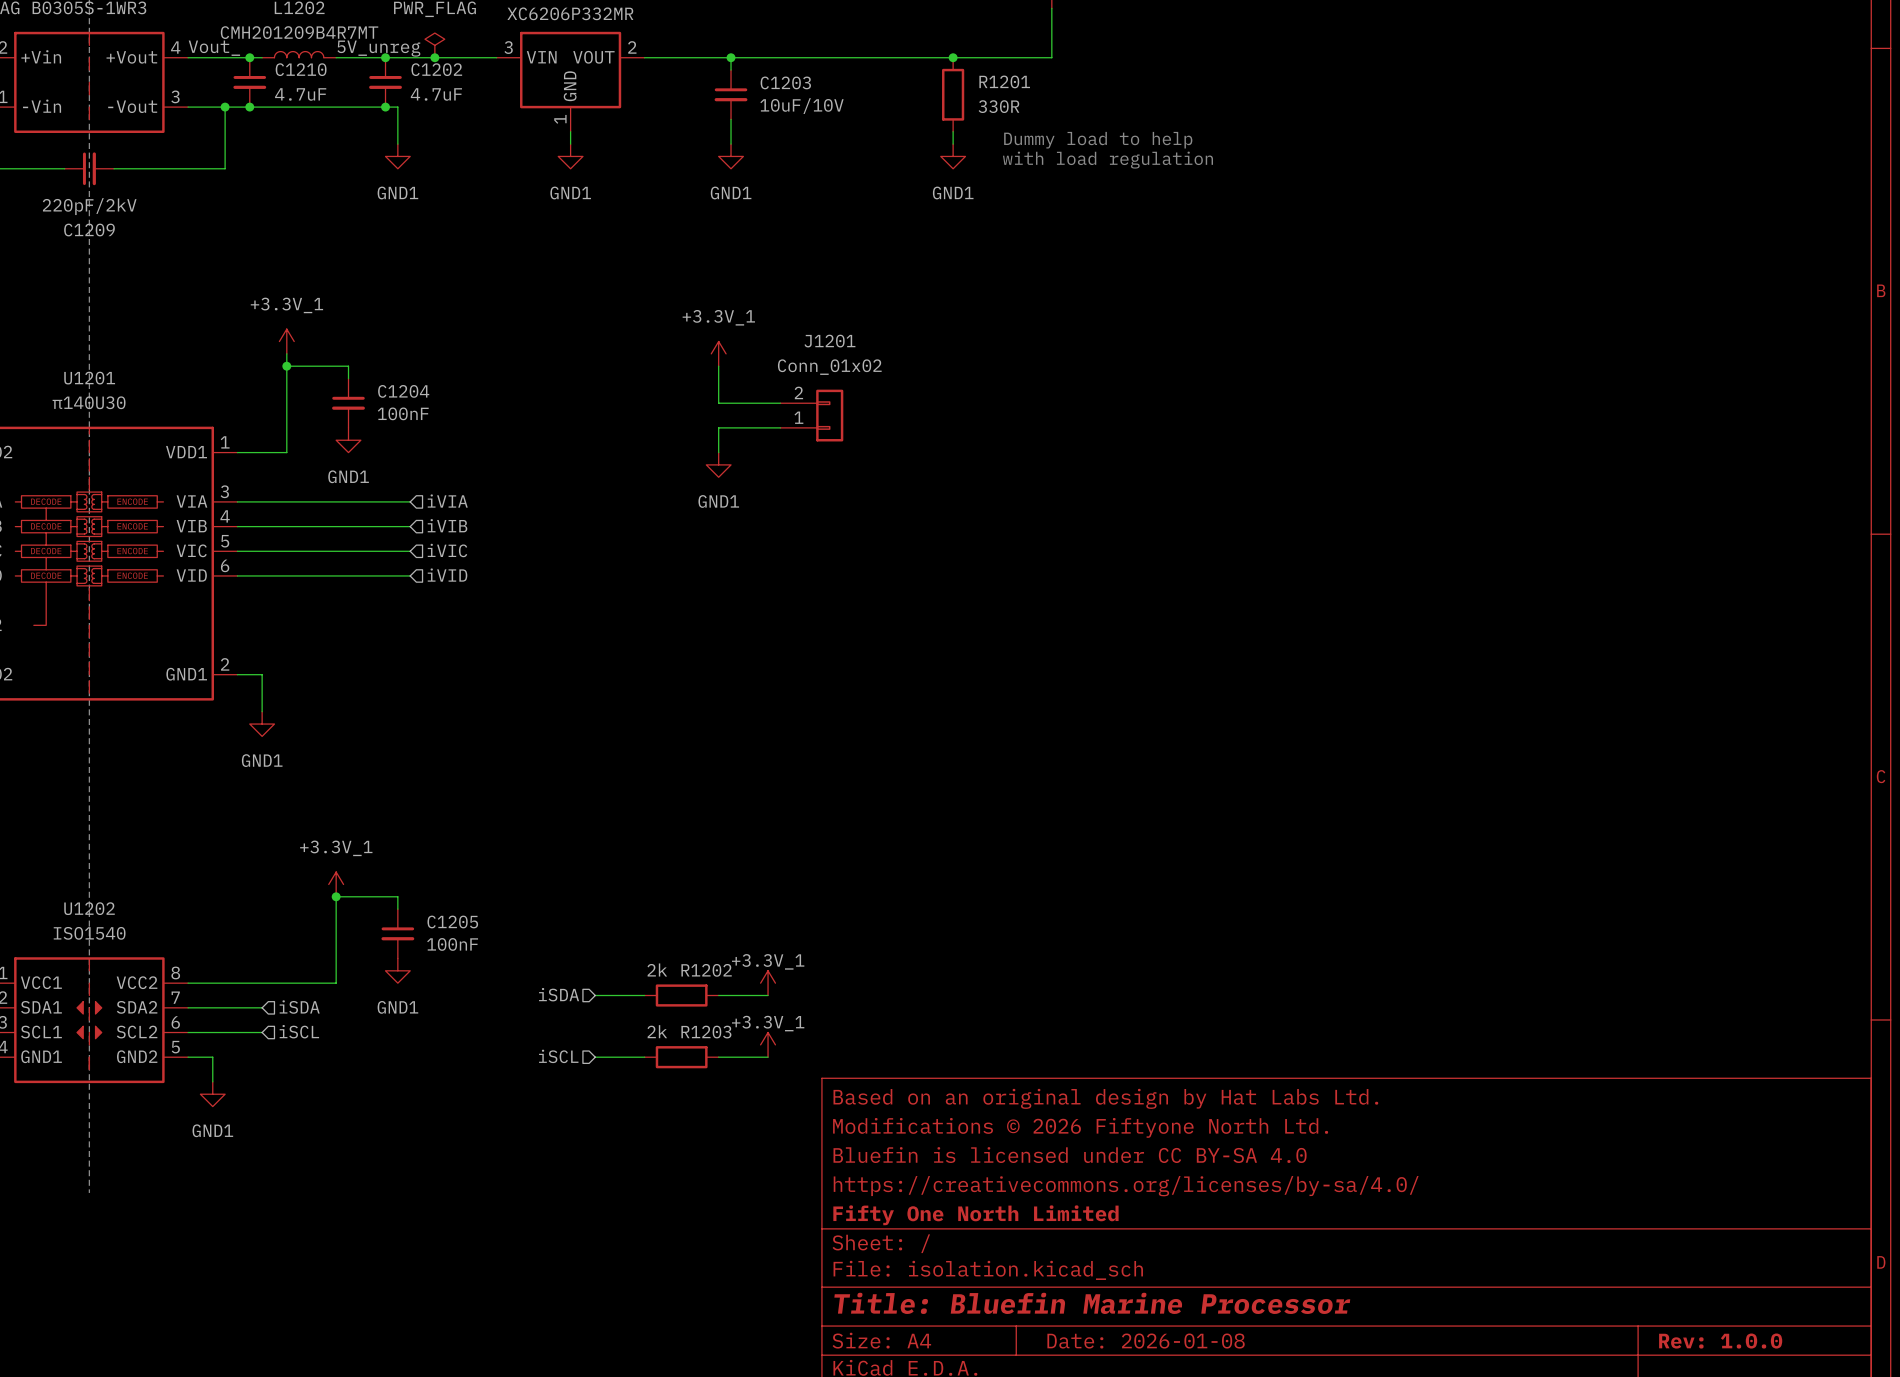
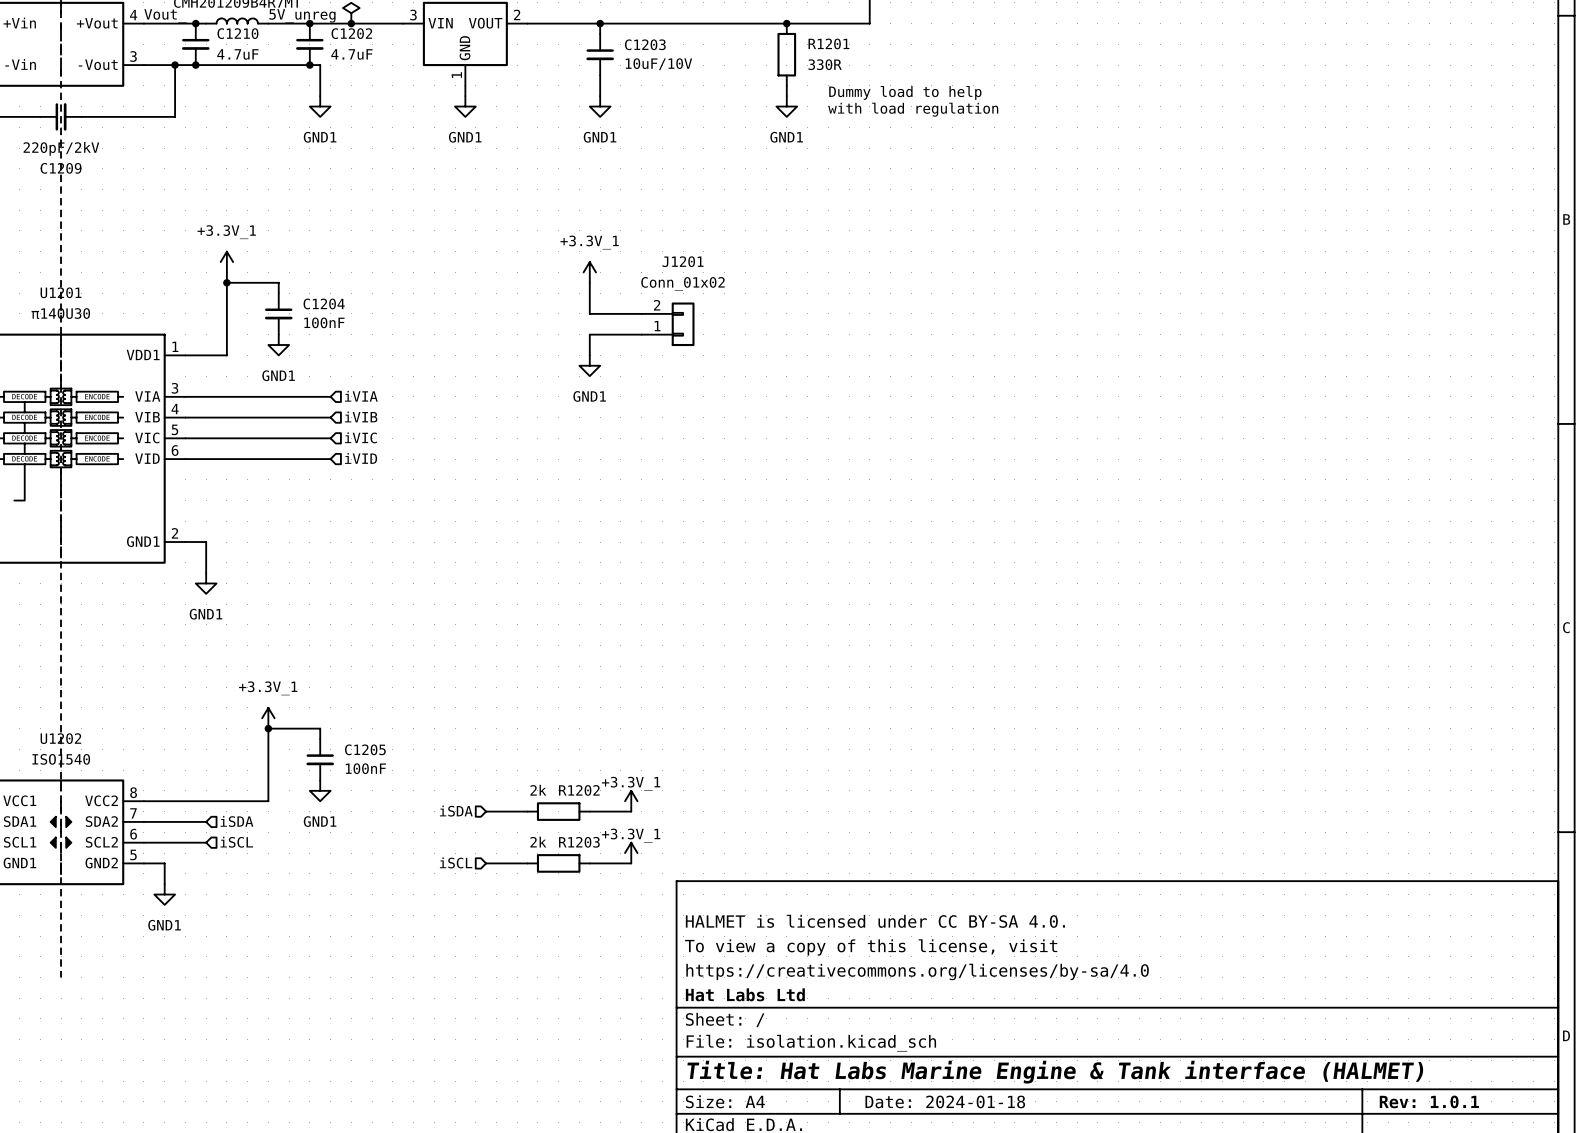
title block: Based on an original design by Hat Labs Ltd. (1105, 1098) -> none
title block: Modifications © 2026 Fiftyone North Ltd. (1080, 1127) -> HALMET is licensed under CC BY-SA 4.0. (875, 921)
title block: Bluefin is licensed under CC BY-SA 4.0 (1070, 1155) -> To view a copy of this license, visit (871, 947)
title block: https://creativecommons.org/licenses/by-sa/4.0/ (1126, 1186) -> https://creativecommons.org/licenses/by-sa/4.0 (917, 971)
title block: Fifty One North Limited (975, 1215) -> Hat Labs Ltd (745, 994)
title block: Title: Bluefin Marine Processor (1092, 1303) -> Title: Hat Labs Marine Engine & Tank interface (HALMET) (1055, 1072)
title block: Date: 2026-01-08 (1146, 1341) -> Date: 2024-01-18 (945, 1101)
title block: Rev: 1.0.0 (1720, 1341) -> Rev: 1.0.1 (1429, 1101)

